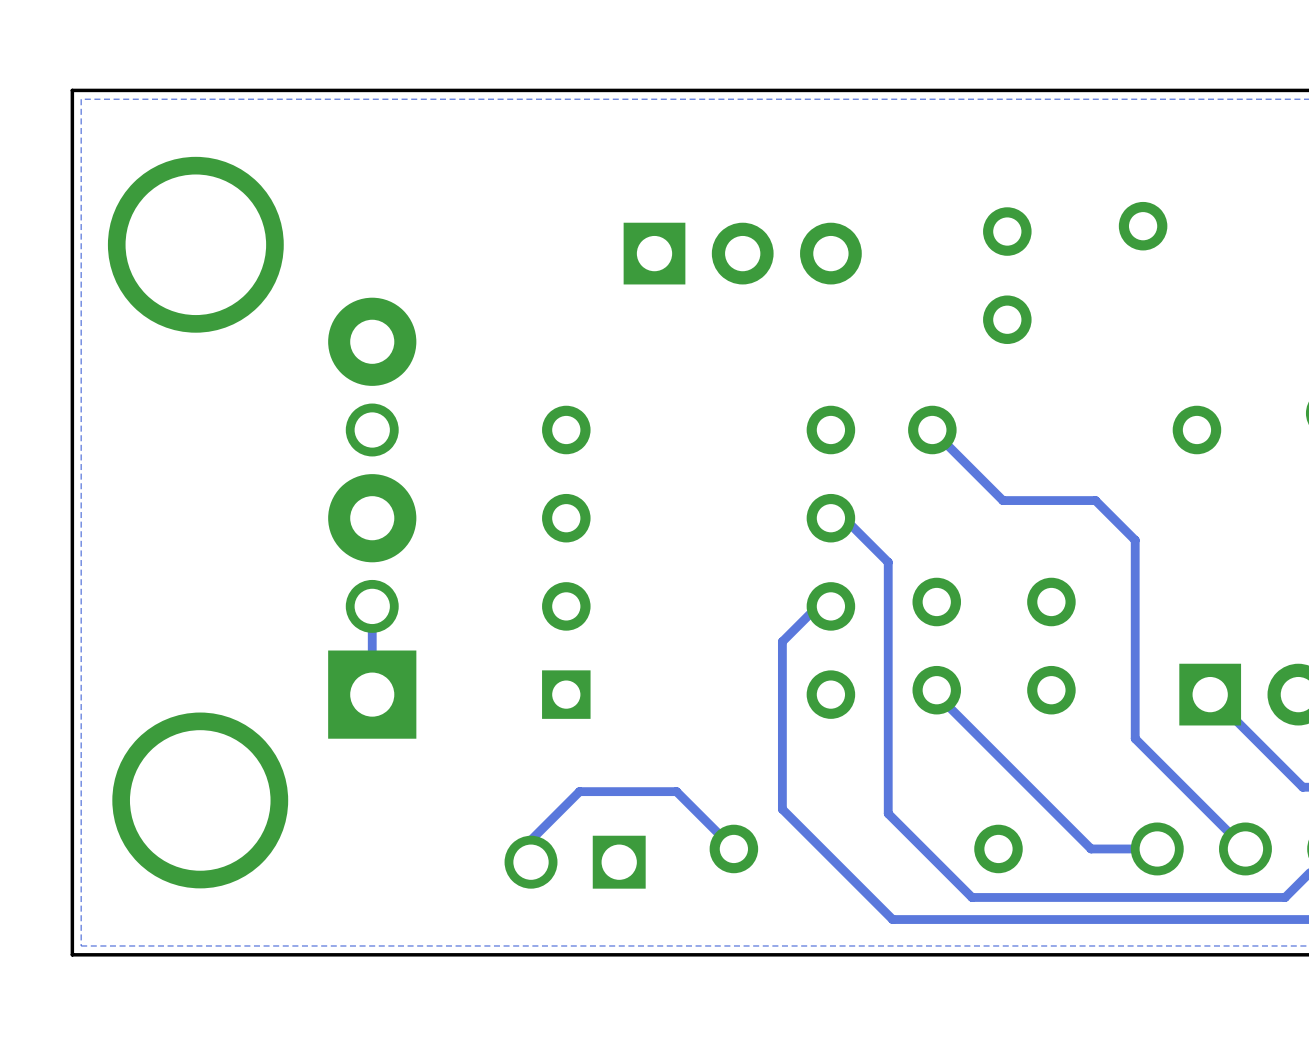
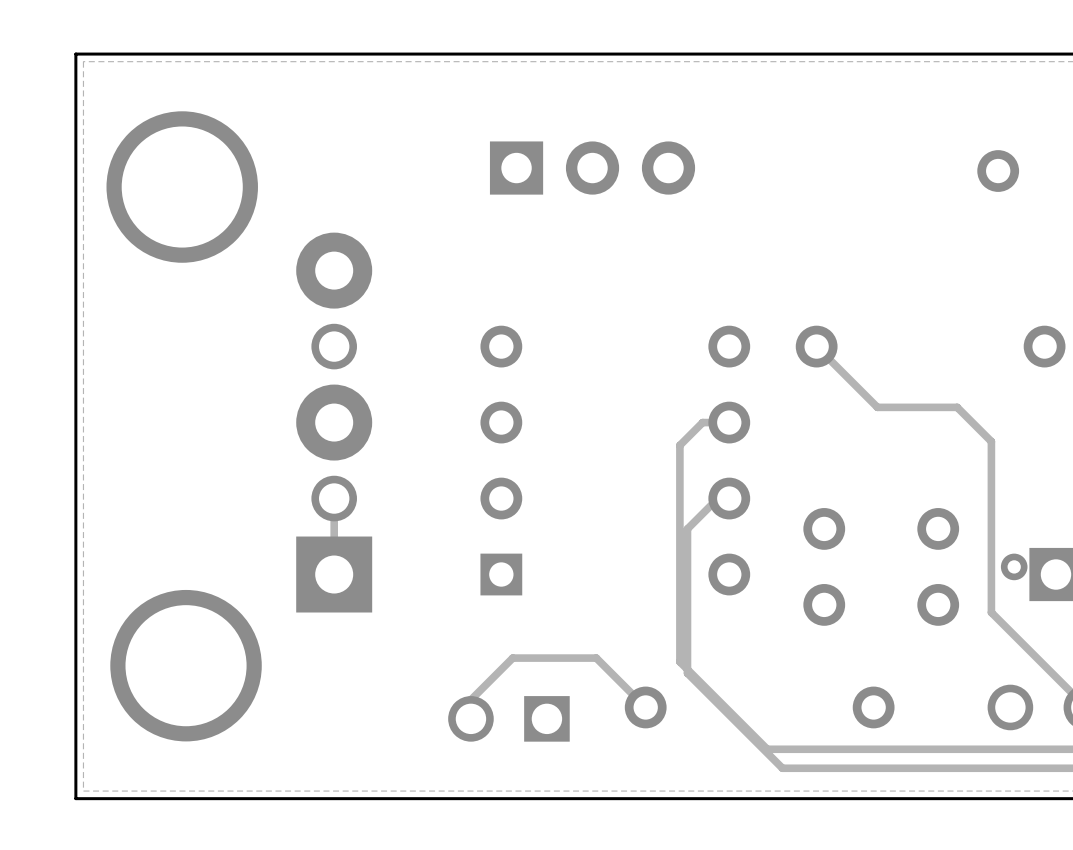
part position: (742, 253) -> (592, 168)
part: (1007, 275) -> none
track: (830, 518) (844, 518) (888, 562) (888, 813) (972, 897) -> (729, 422) (702, 422) (679, 445) (679, 661) (767, 749) (850, 749)
part position: (936, 646) -> (824, 566)
part position: (1051, 646) -> (938, 566)
via: none -> (1014, 566)
track: (936, 690) (936, 694) (1091, 848) (1157, 848) -> none

